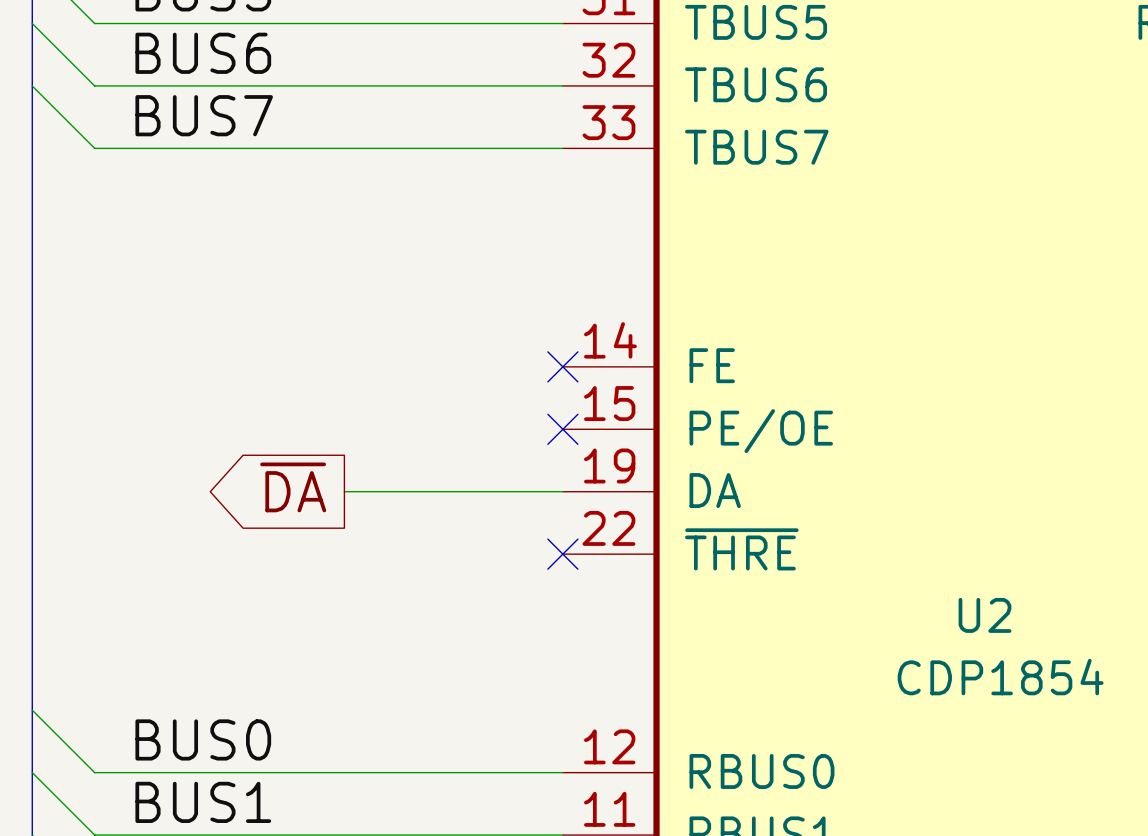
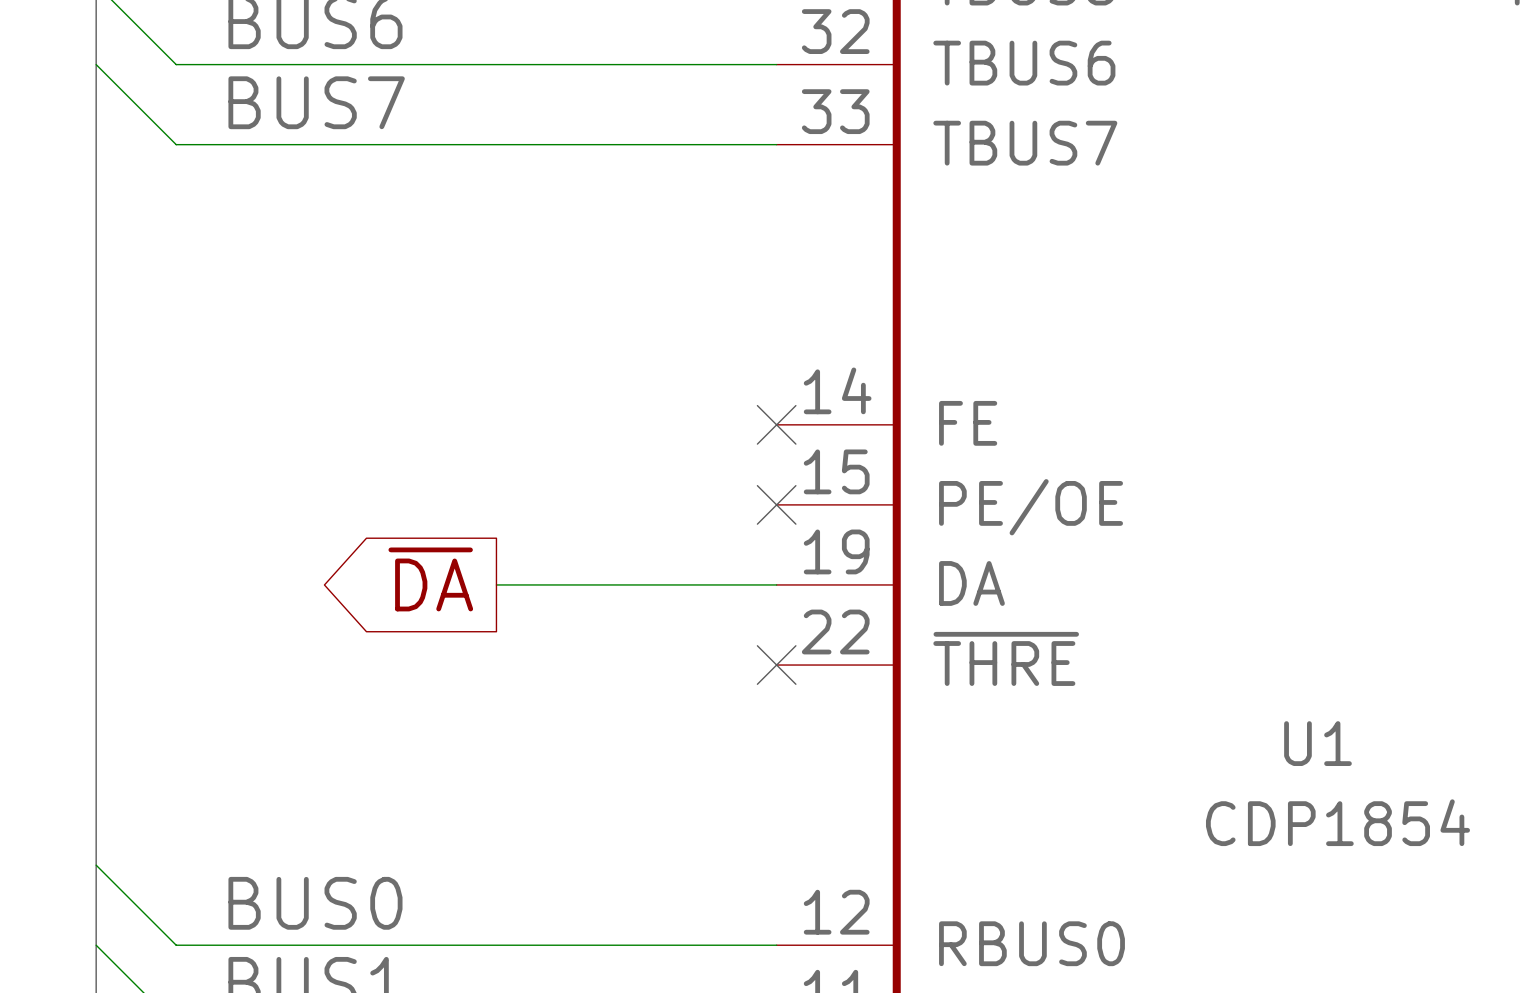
U2 name: U2 (984, 615) -> U1 (1317, 743)

